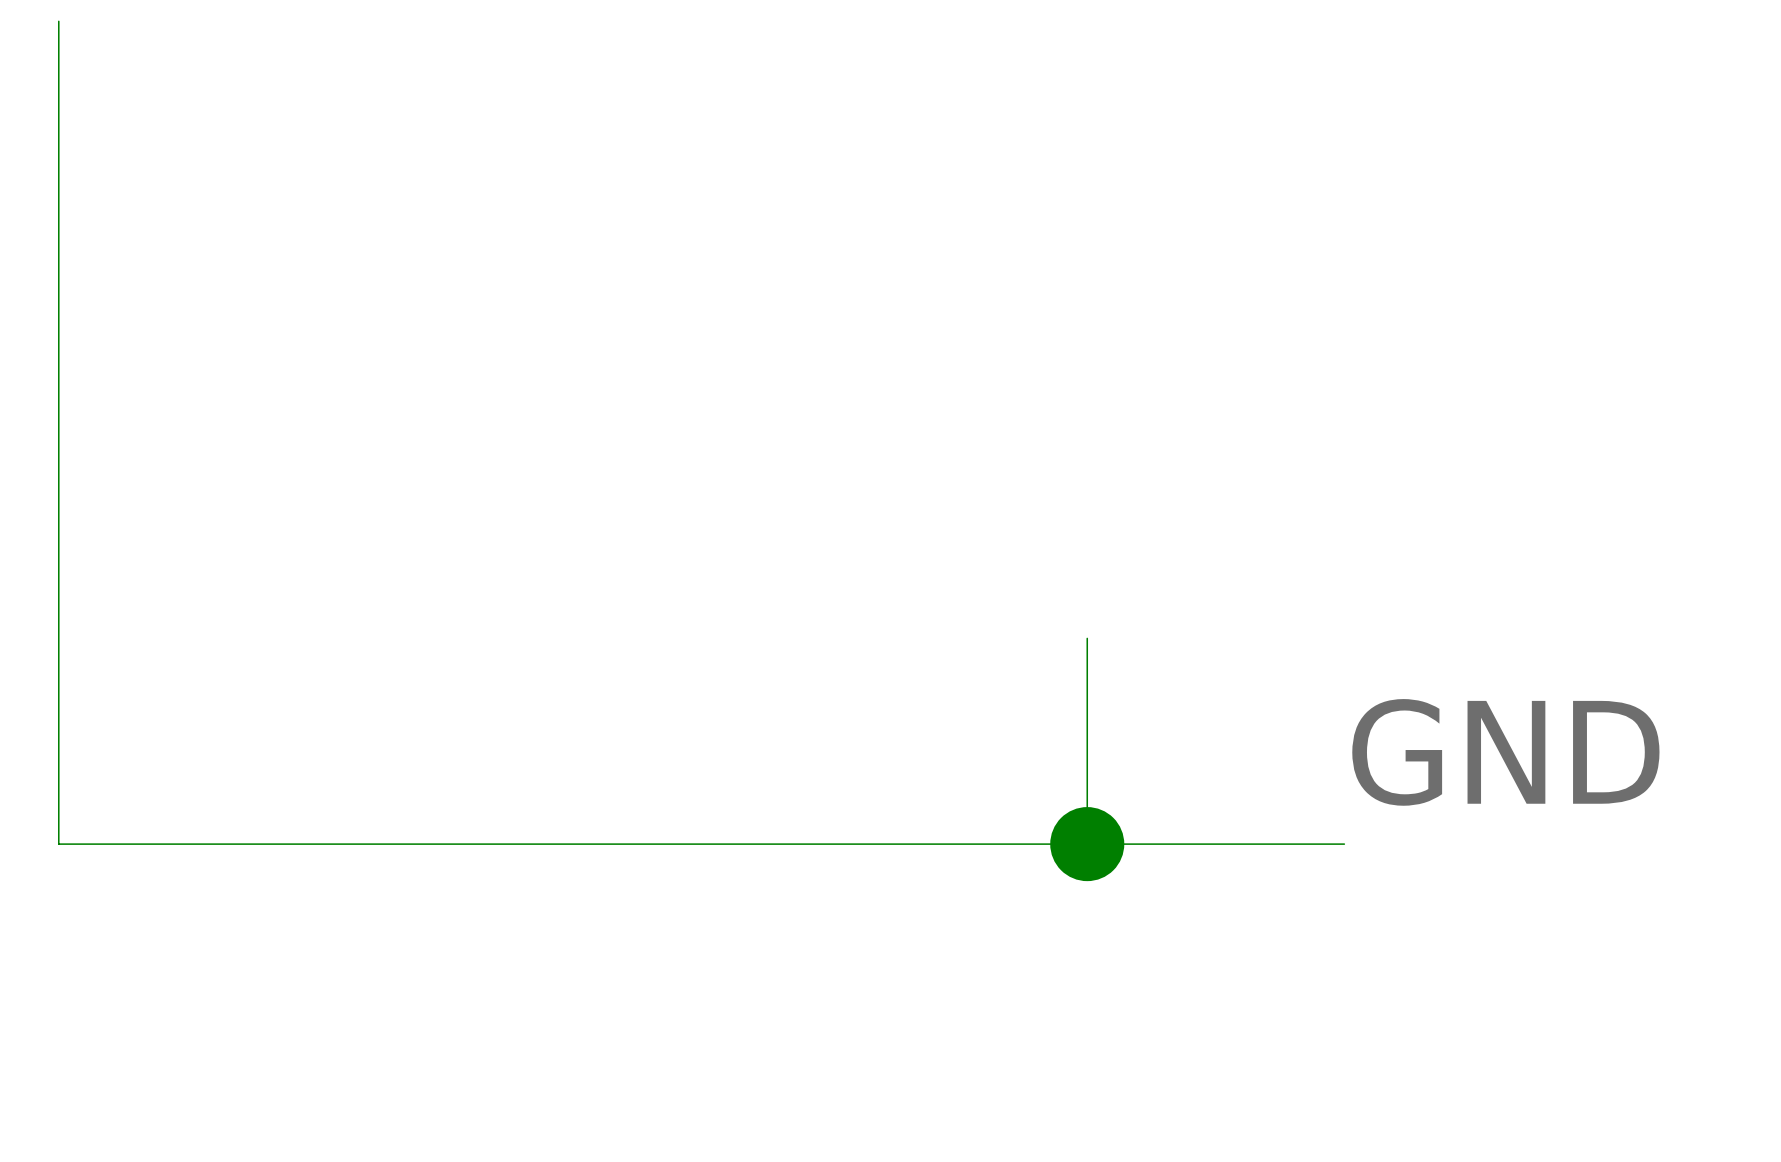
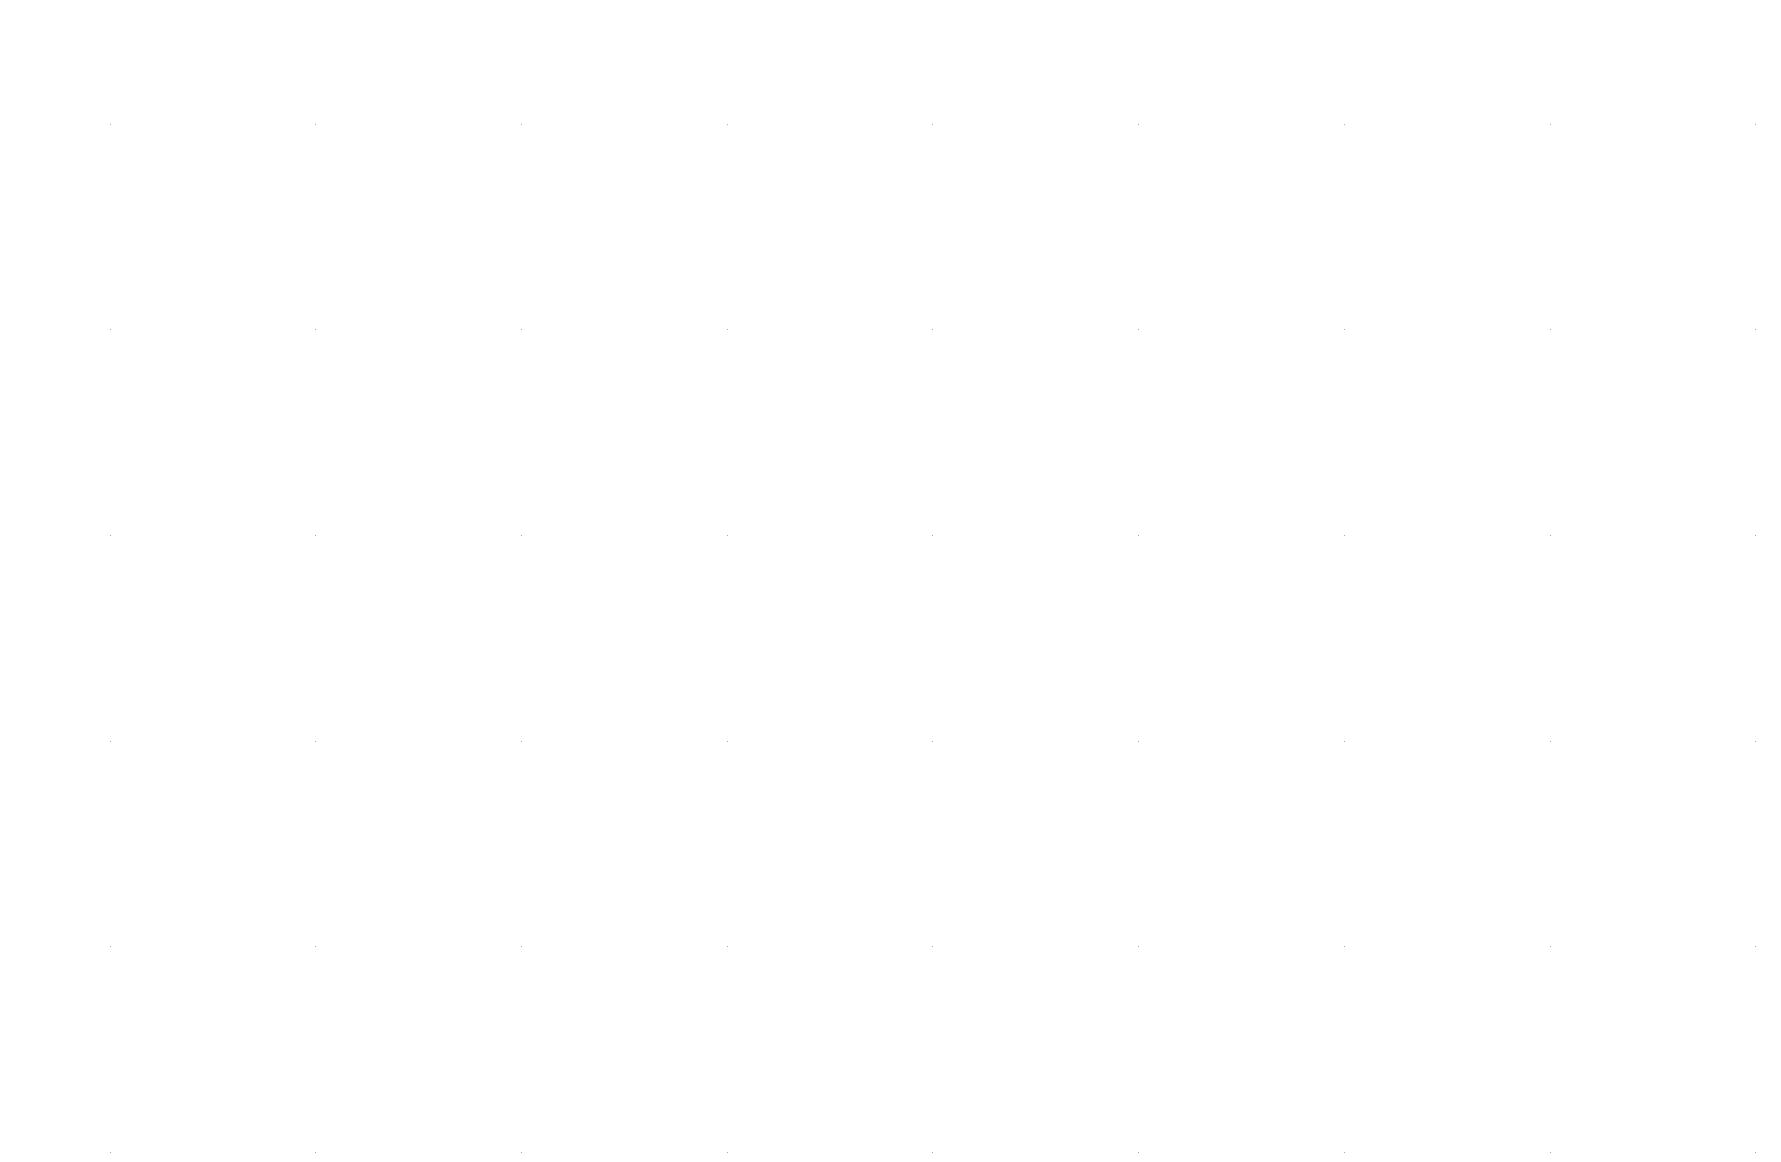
wire: (58, 21) (58, 844) (1344, 844) -> none
wire: (1087, 638) (1087, 844) -> none
label: GND (1505, 752) -> none
junction: (1087, 844) -> none

